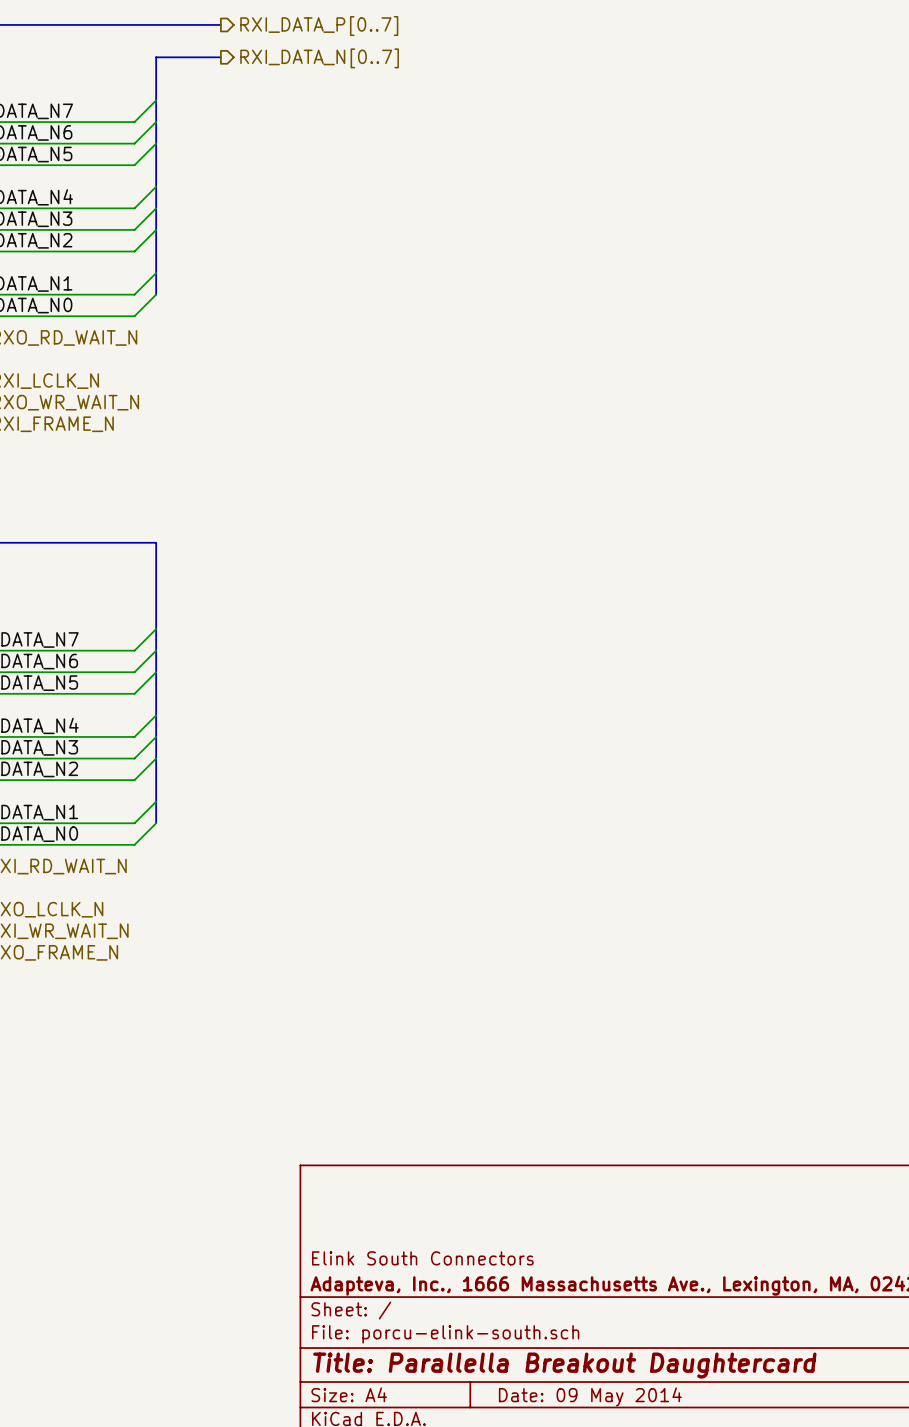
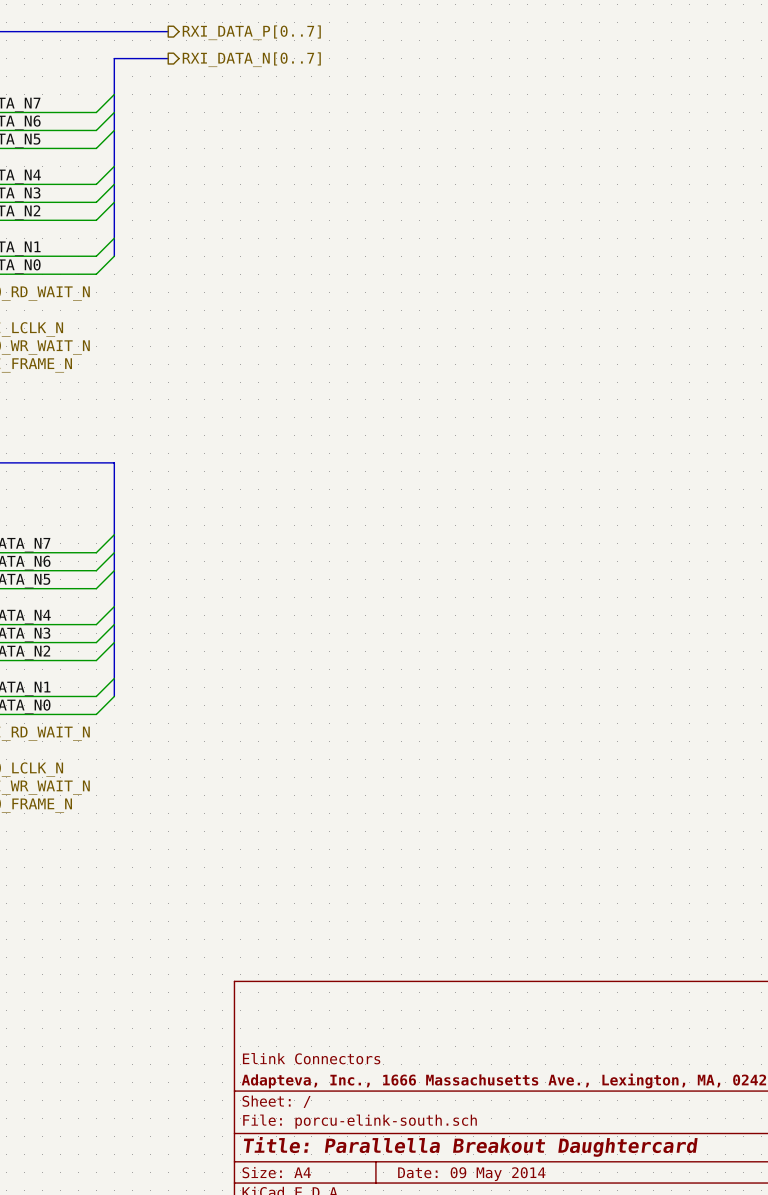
title block: Elink South Connectors (422, 1258) -> Elink Connectors (311, 1058)

